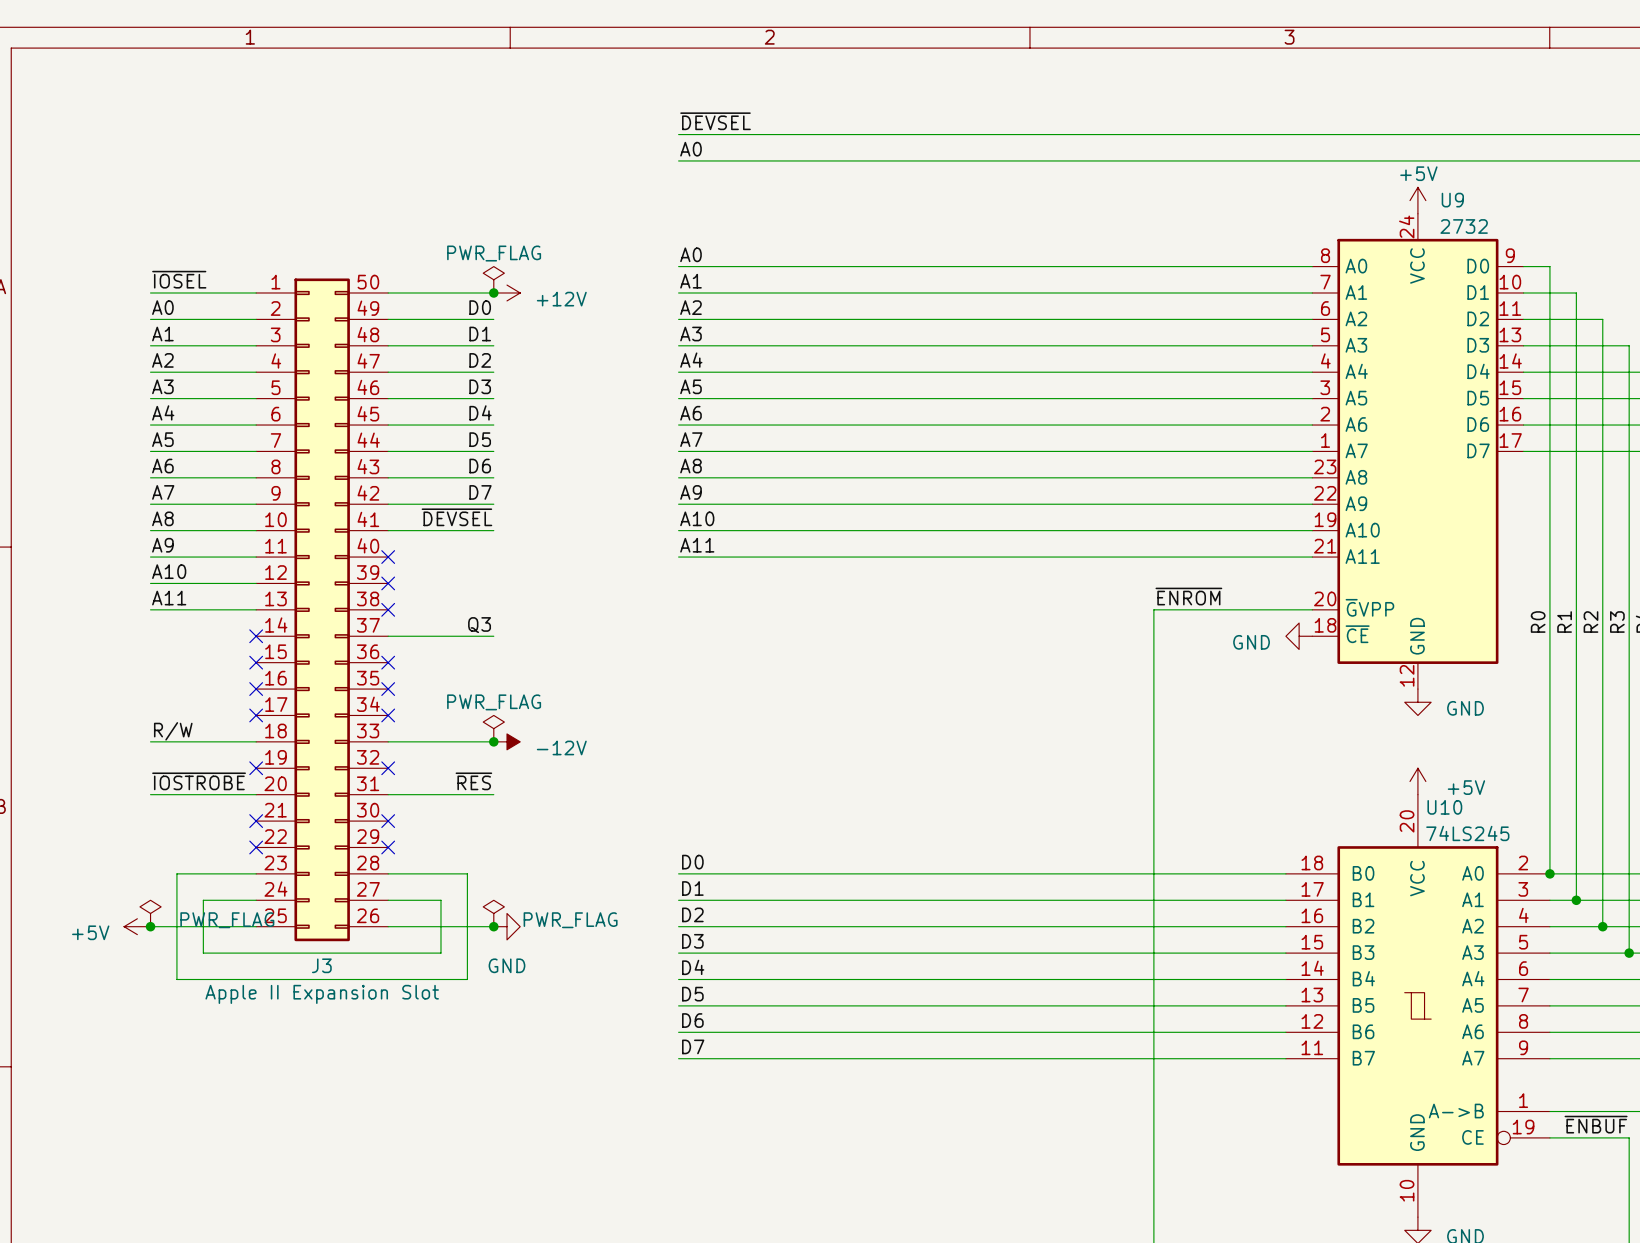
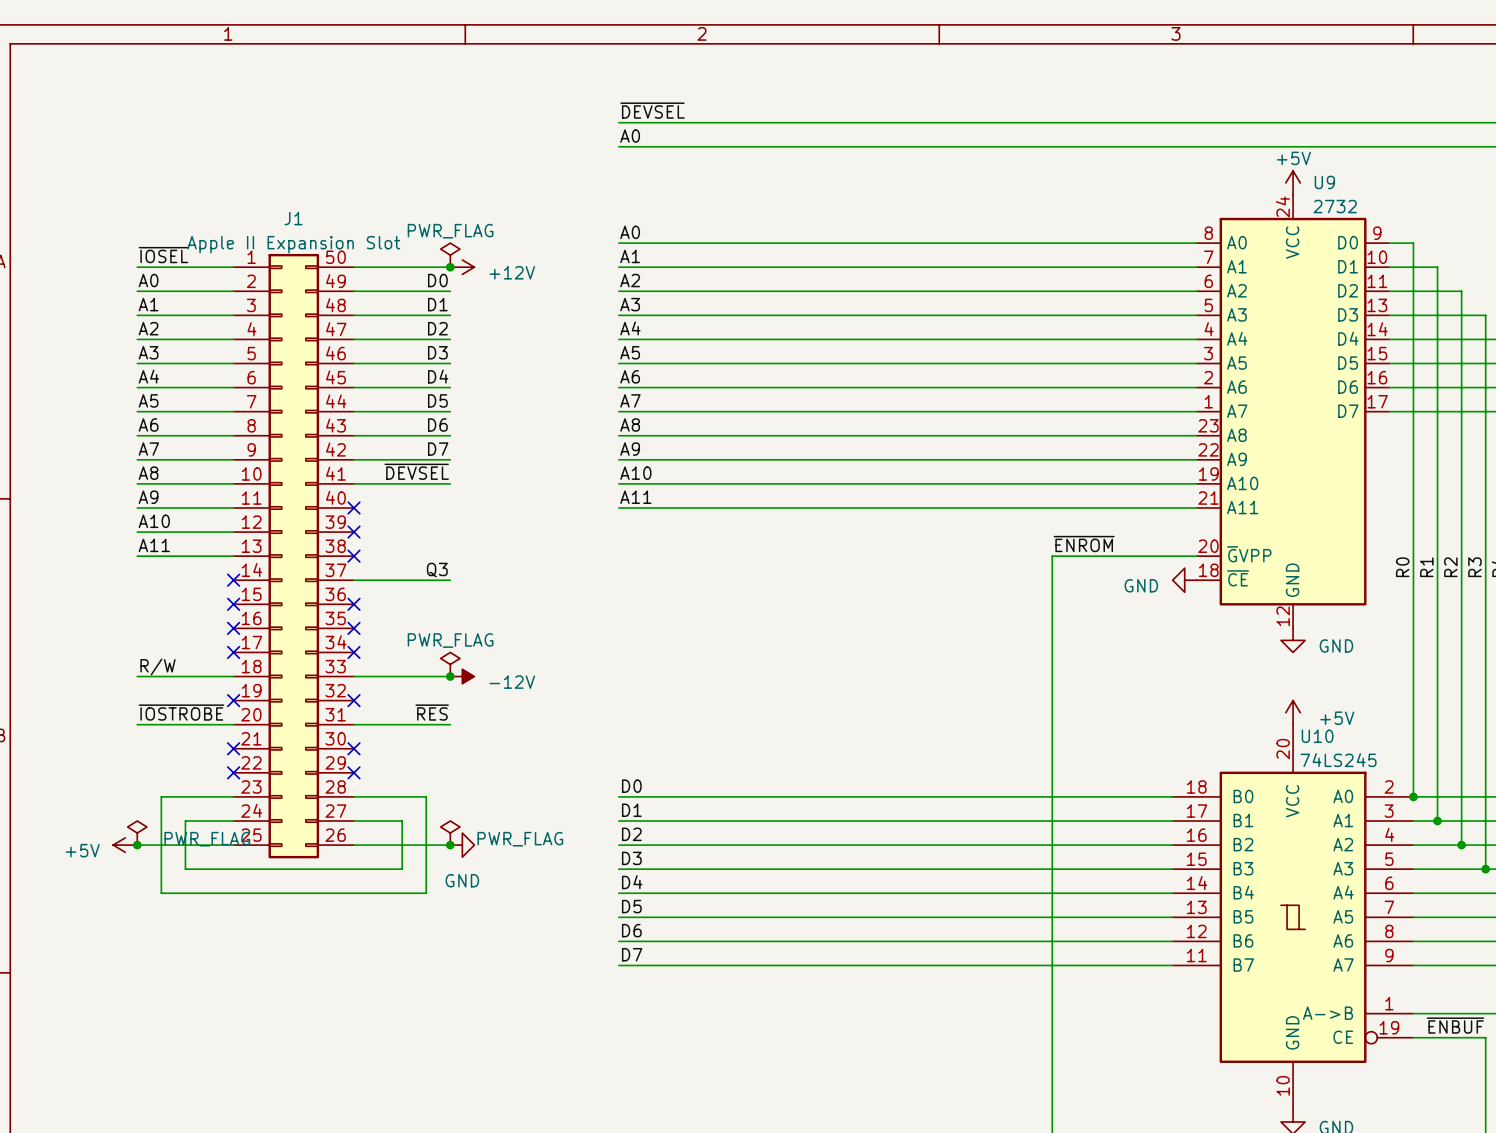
J3 name: J3 (321, 965) -> J1 (293, 218)
J3 value position: Apple II Expansion Slot (322, 994) -> Apple II Expansion Slot (293, 244)

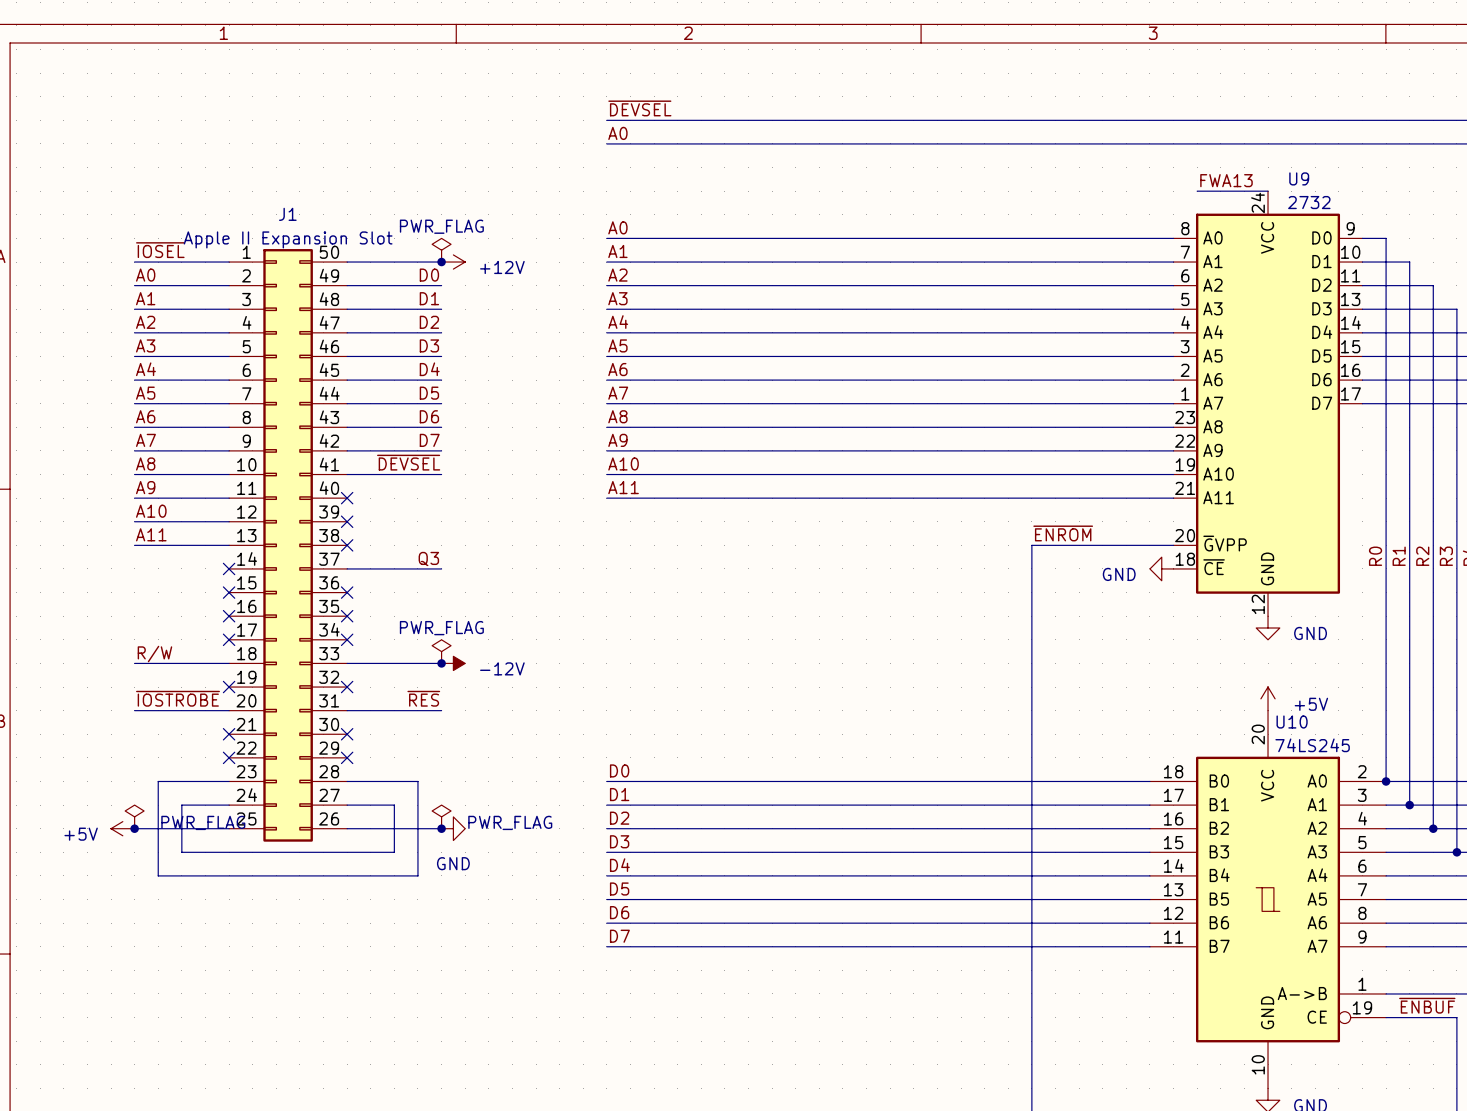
power symbol: +5V (1293, 182) -> none
label: none -> FWA13 (1226, 180)
wire: none -> (1197, 191) (1268, 191)

